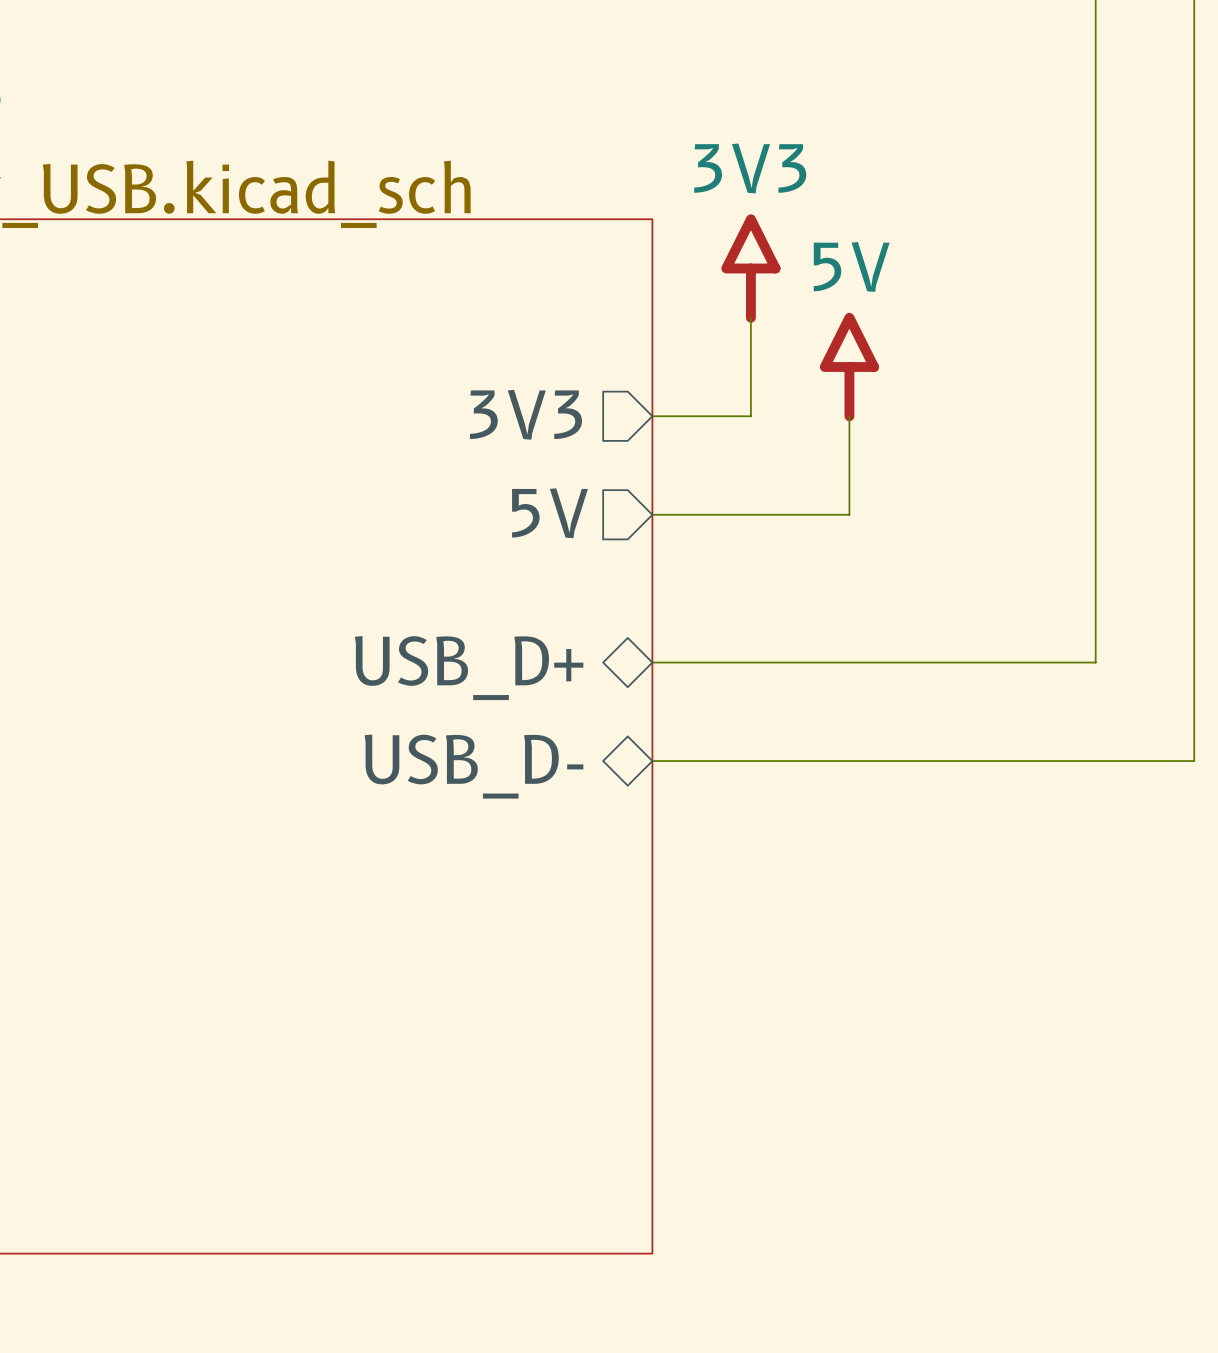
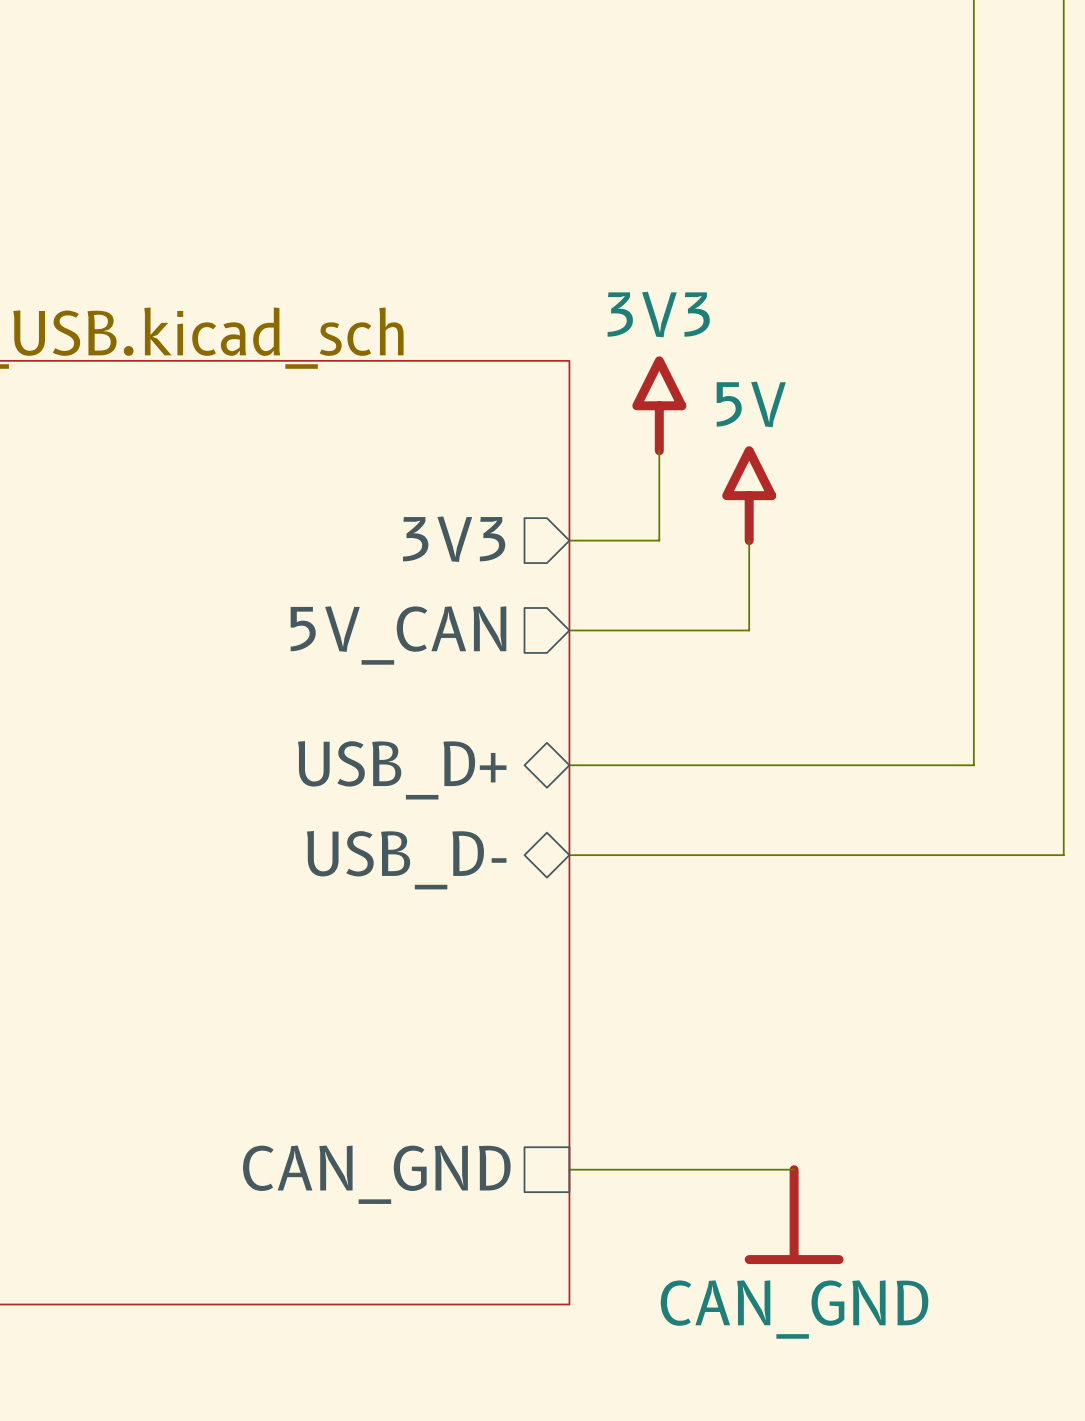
sheet pin: 5V (549, 513) -> 5V_CAN (398, 635)
wire: none -> (569, 1169) (794, 1169)
sheet pin: none -> CAN_GND (376, 1174)
power symbol: none -> CAN_GND (794, 1214)

